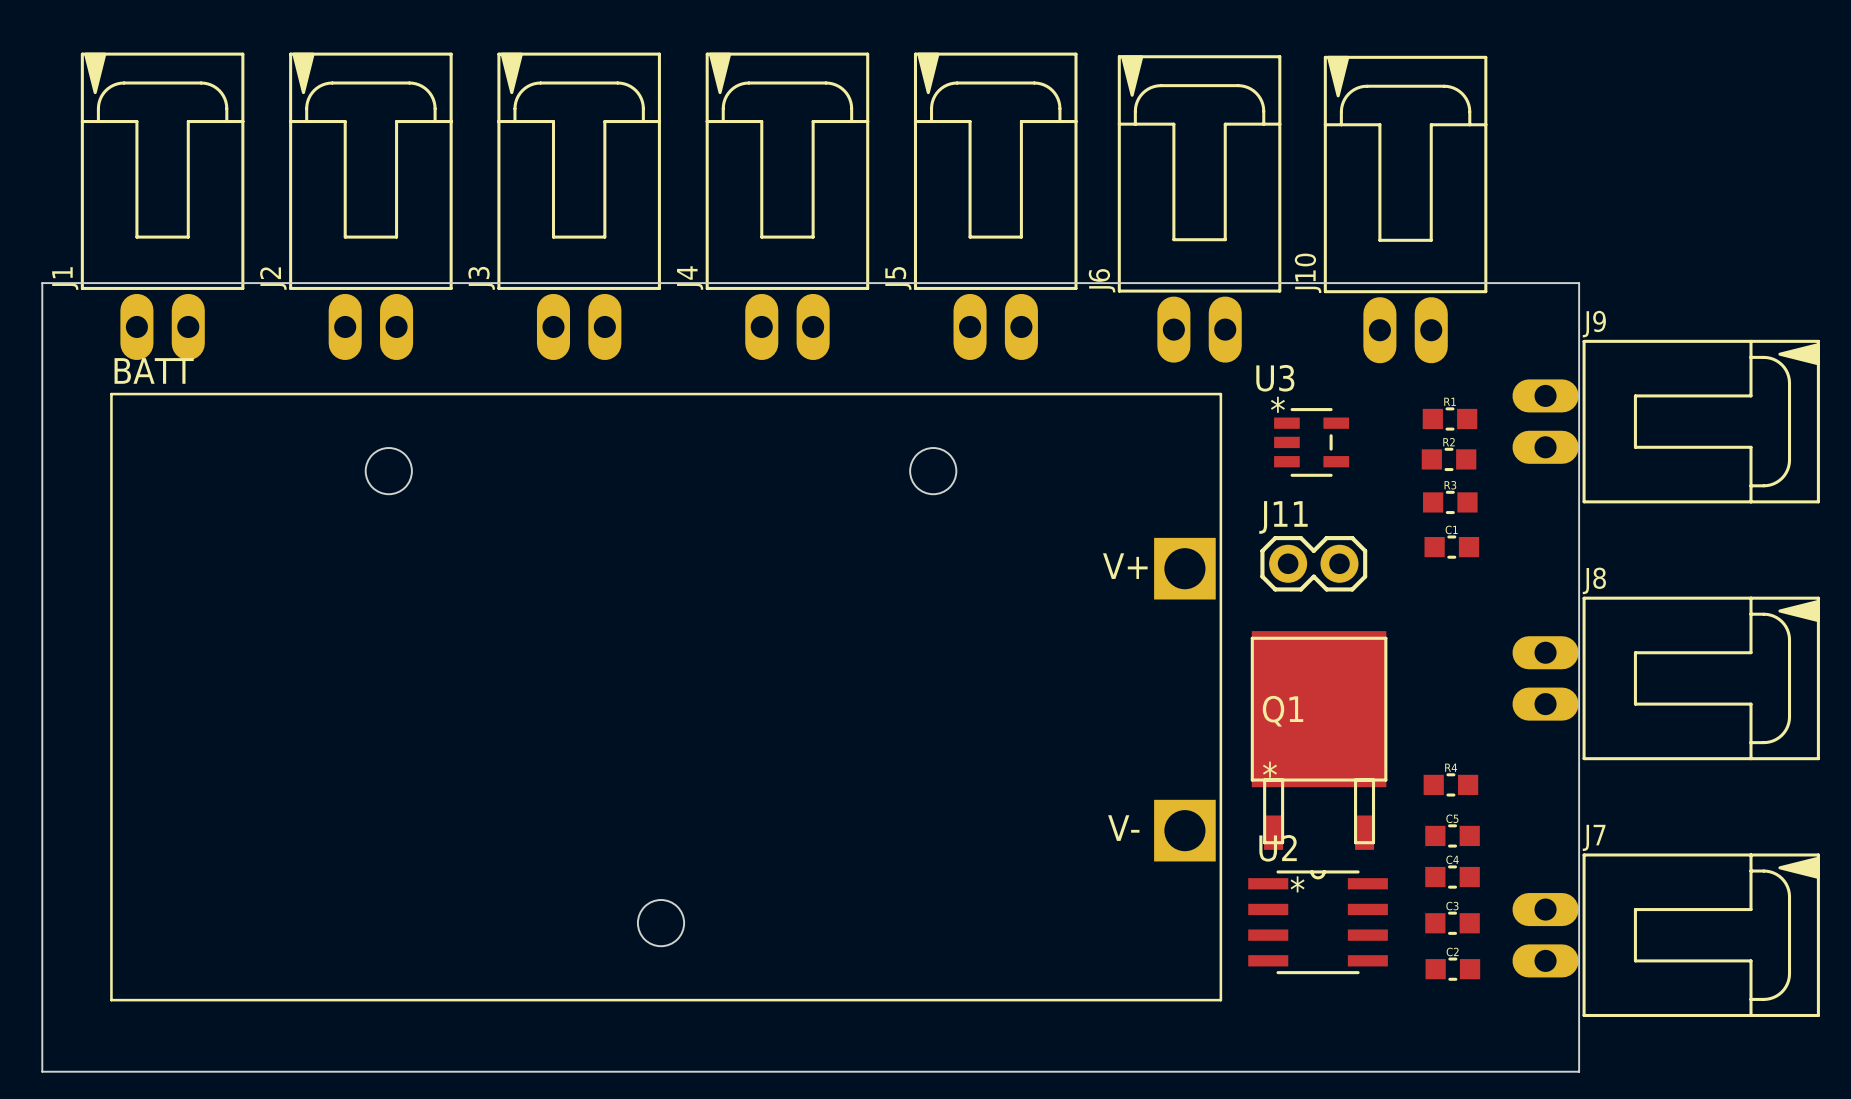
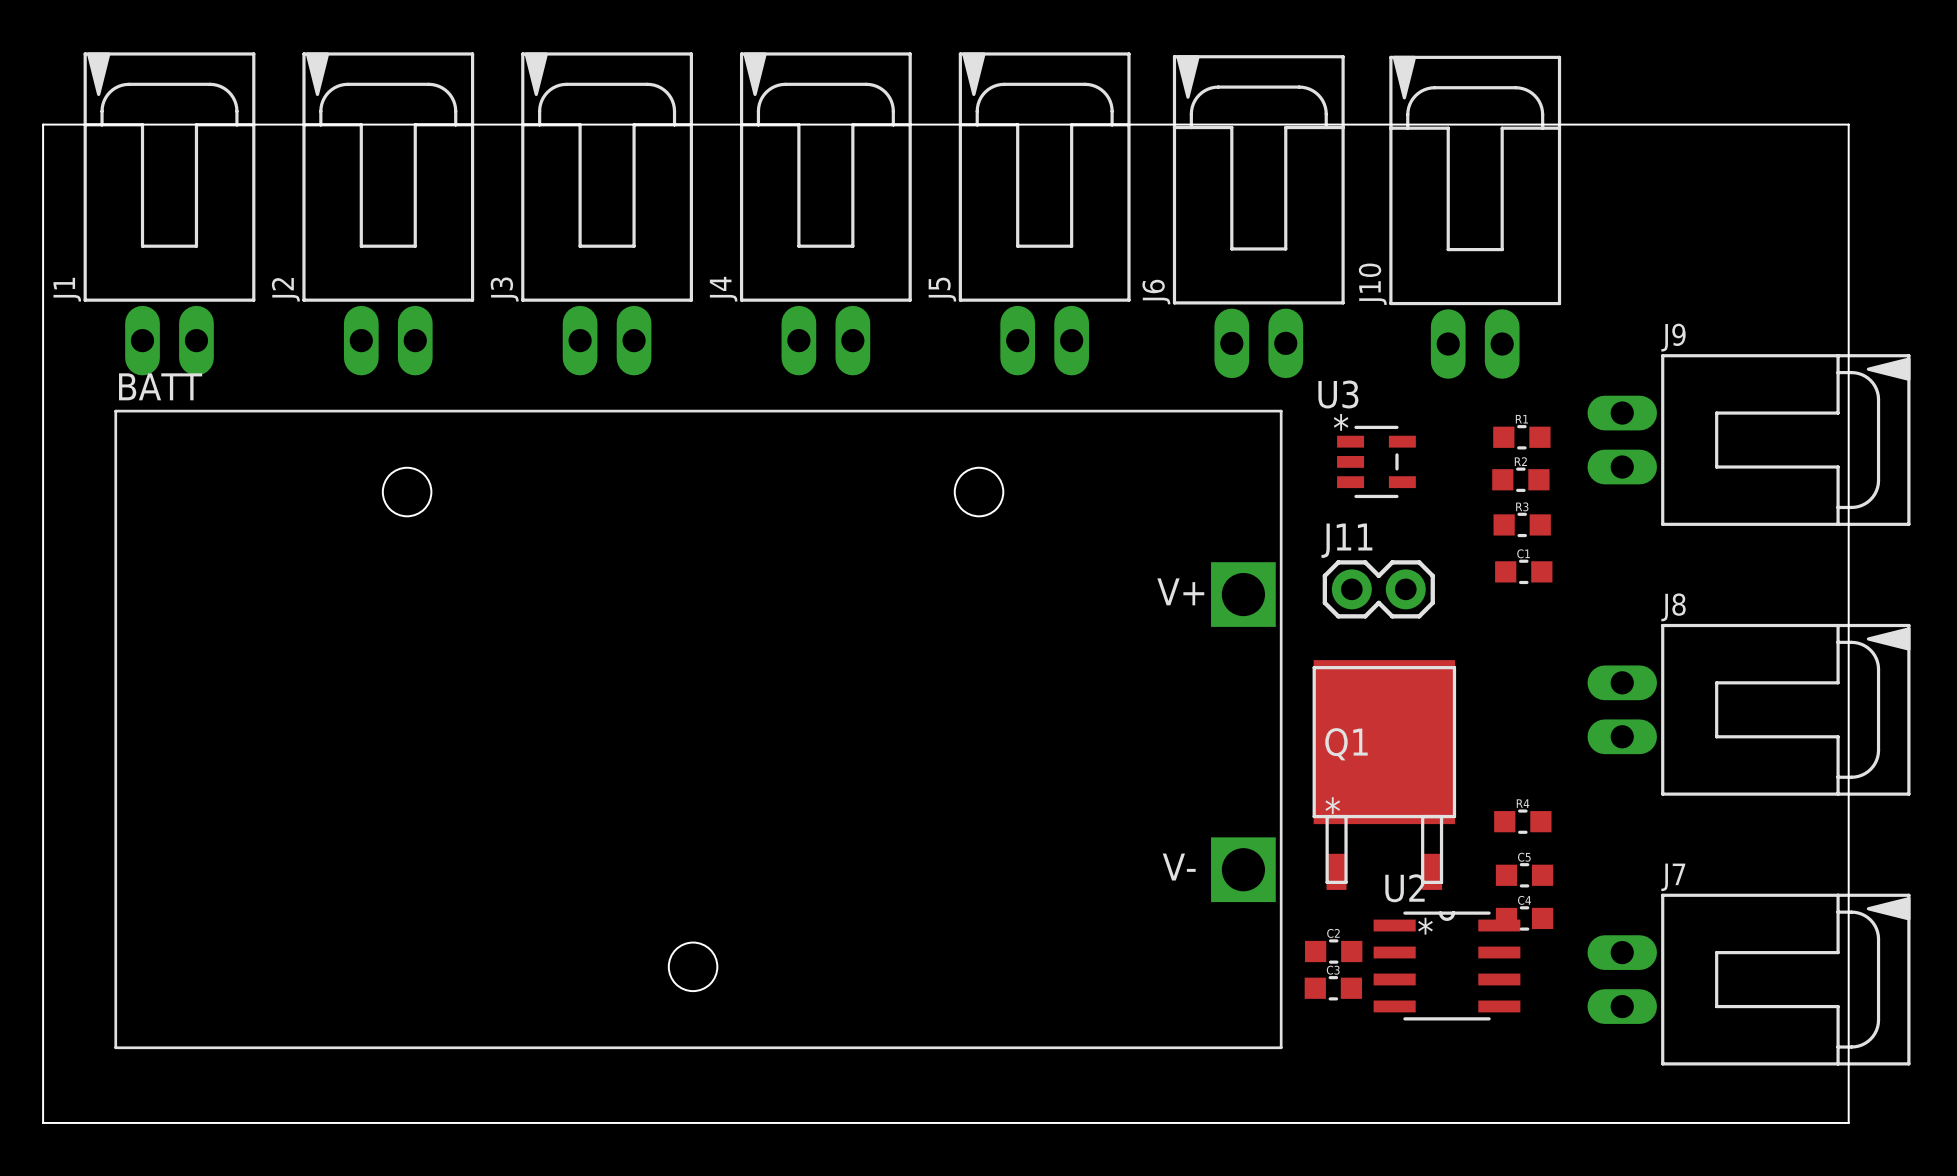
board edge: (42, 283) (1579, 283) (1579, 1071) -> (43, 294) (43, 124) (1848, 124) (1848, 1122) (1657, 1122)
U2 position: (1318, 922) -> (1447, 965)
C3 position: (1452, 923) -> (1333, 988)
C2 position: (1452, 969) -> (1333, 951)

